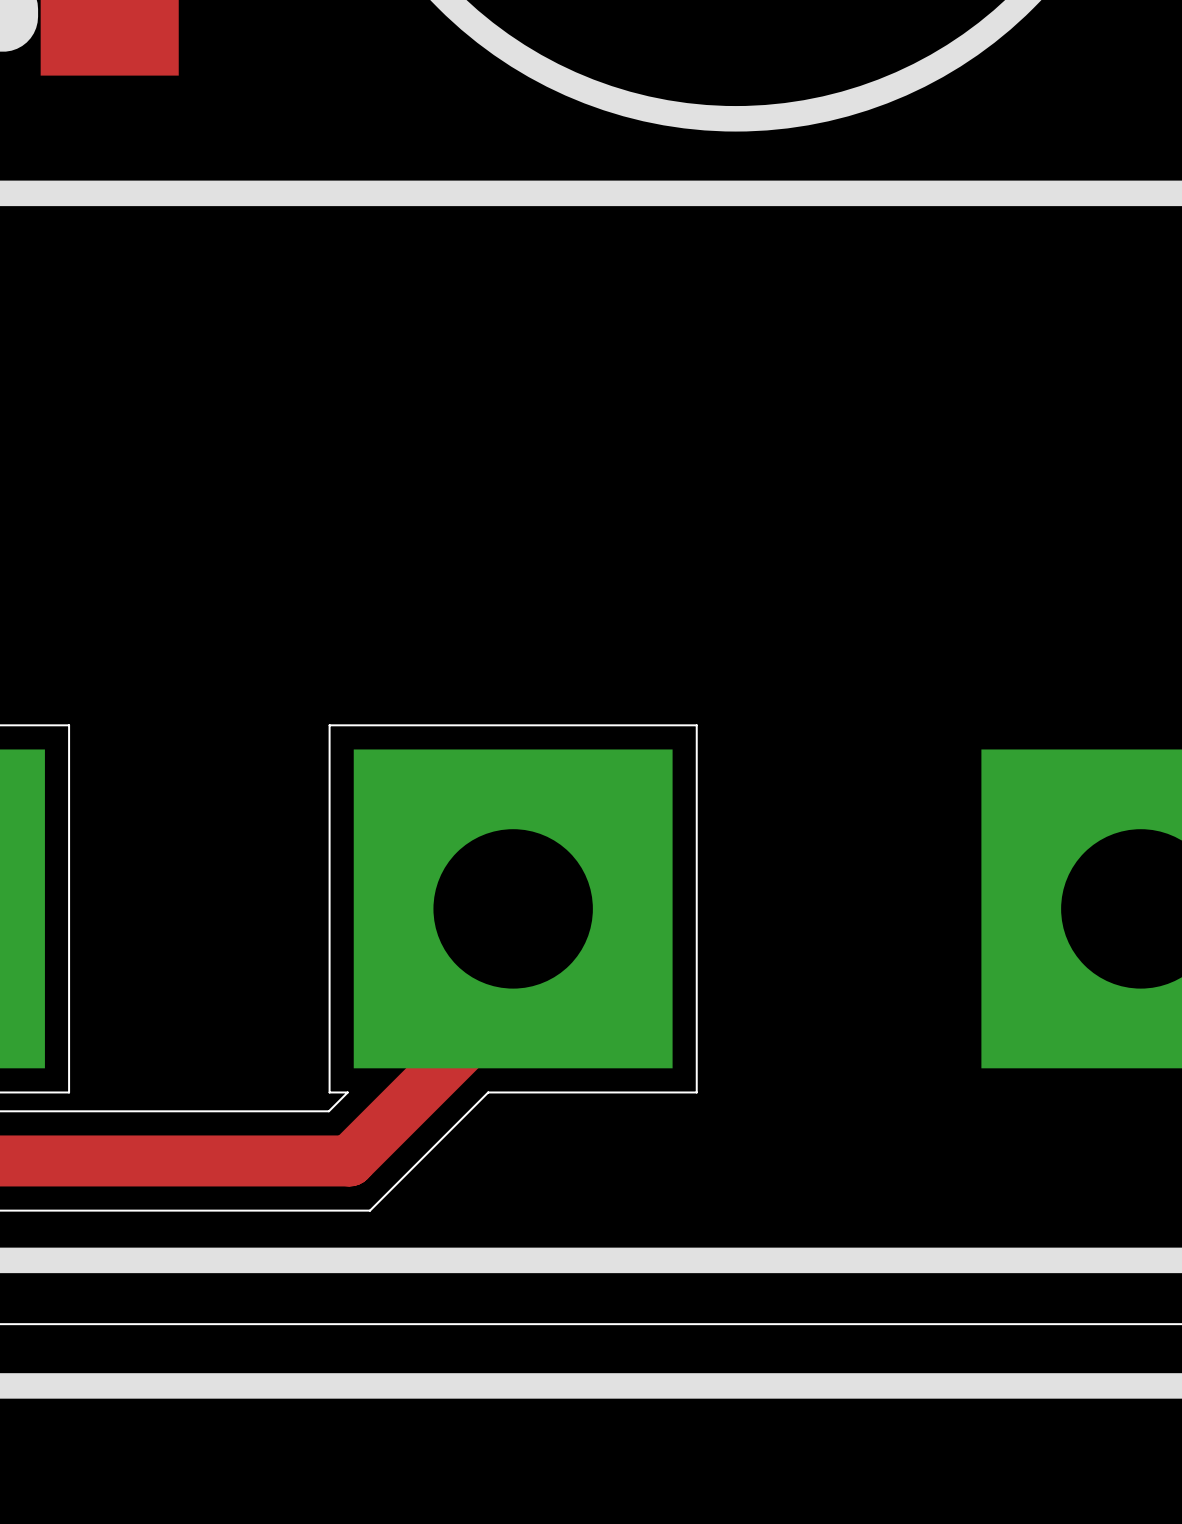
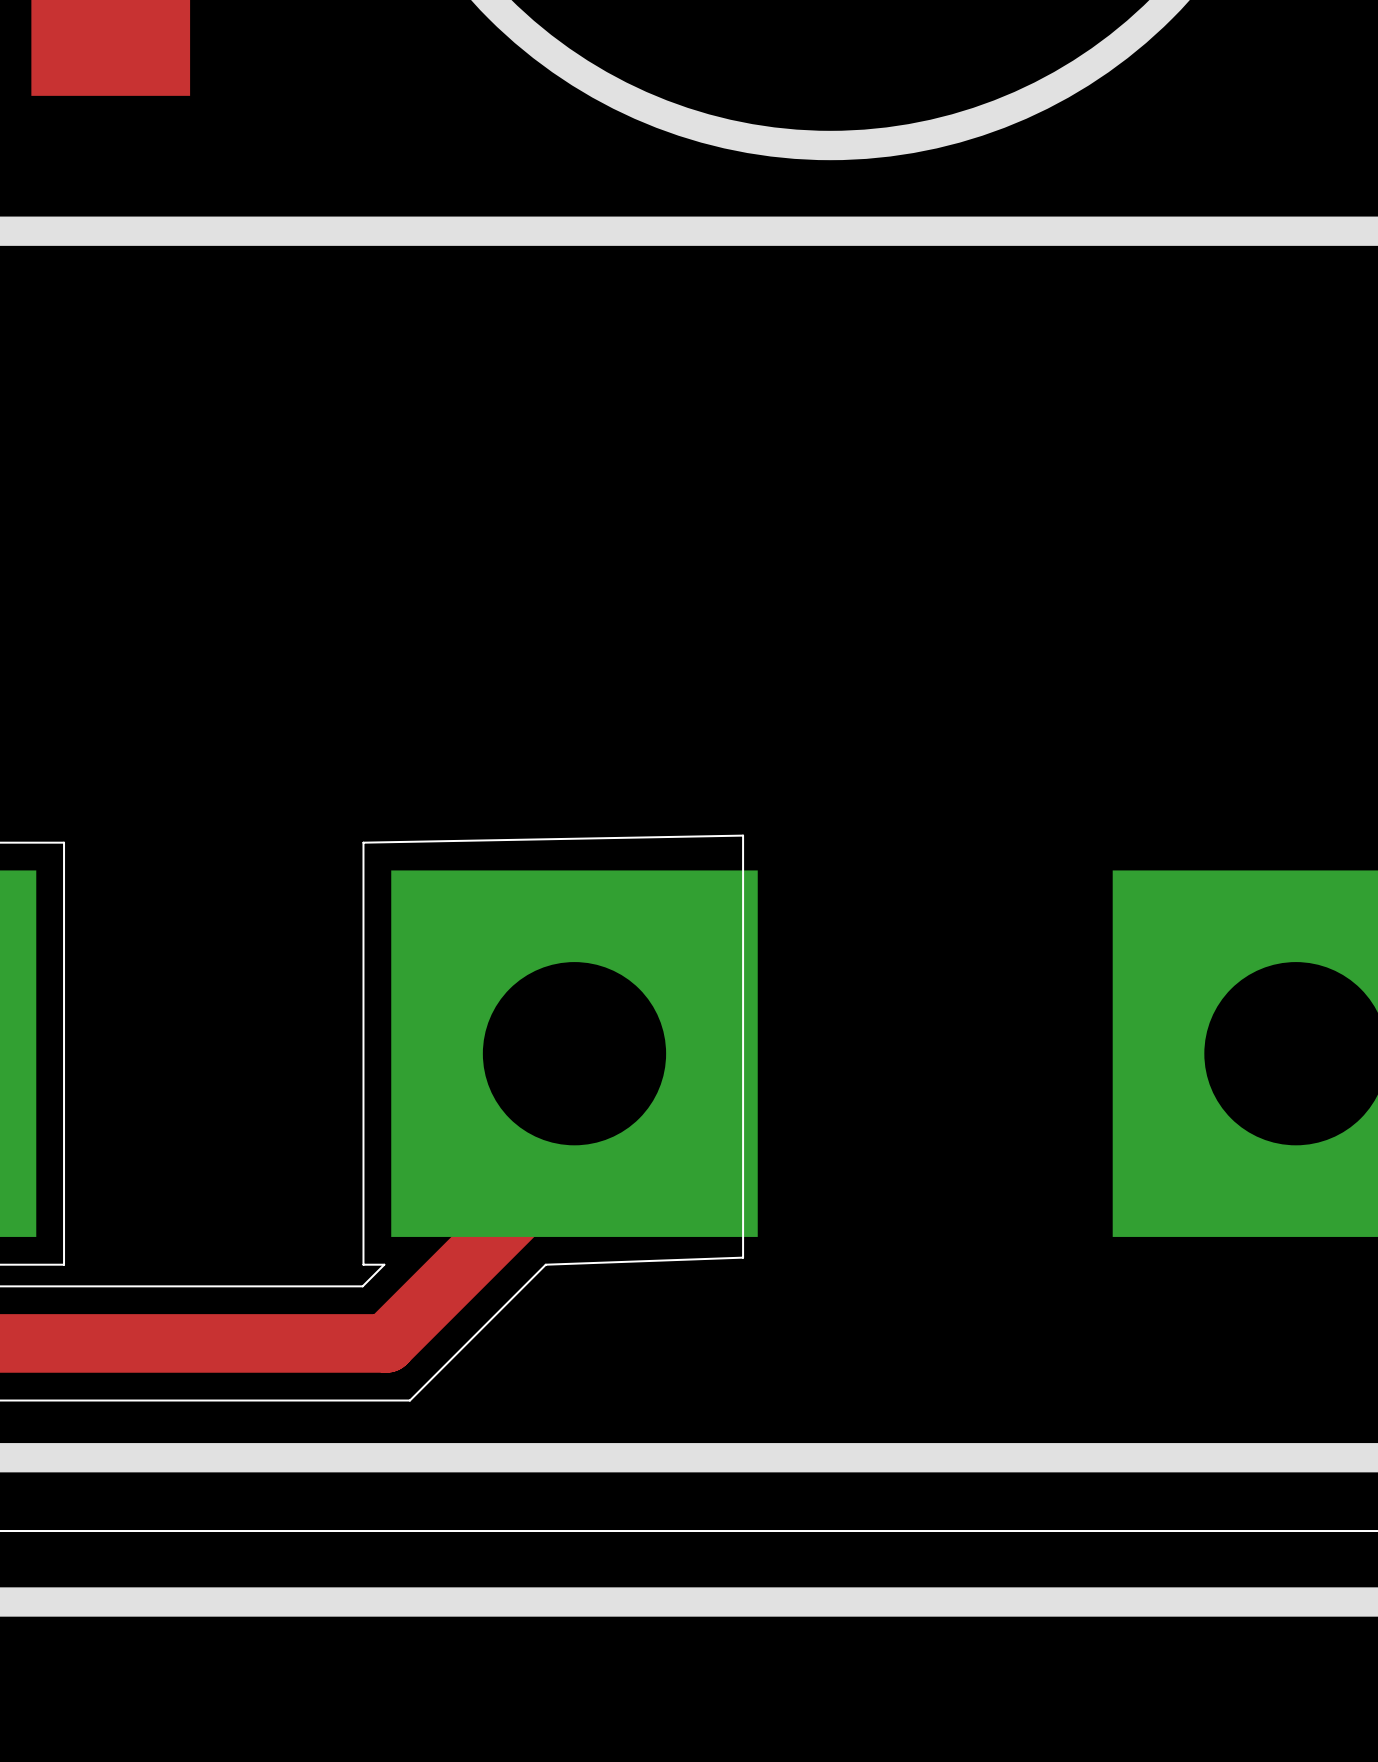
board edge: (329, 725) (696, 725) (696, 1092) (488, 1092) -> (363, 842) (743, 835) (743, 1257) (545, 1264)

